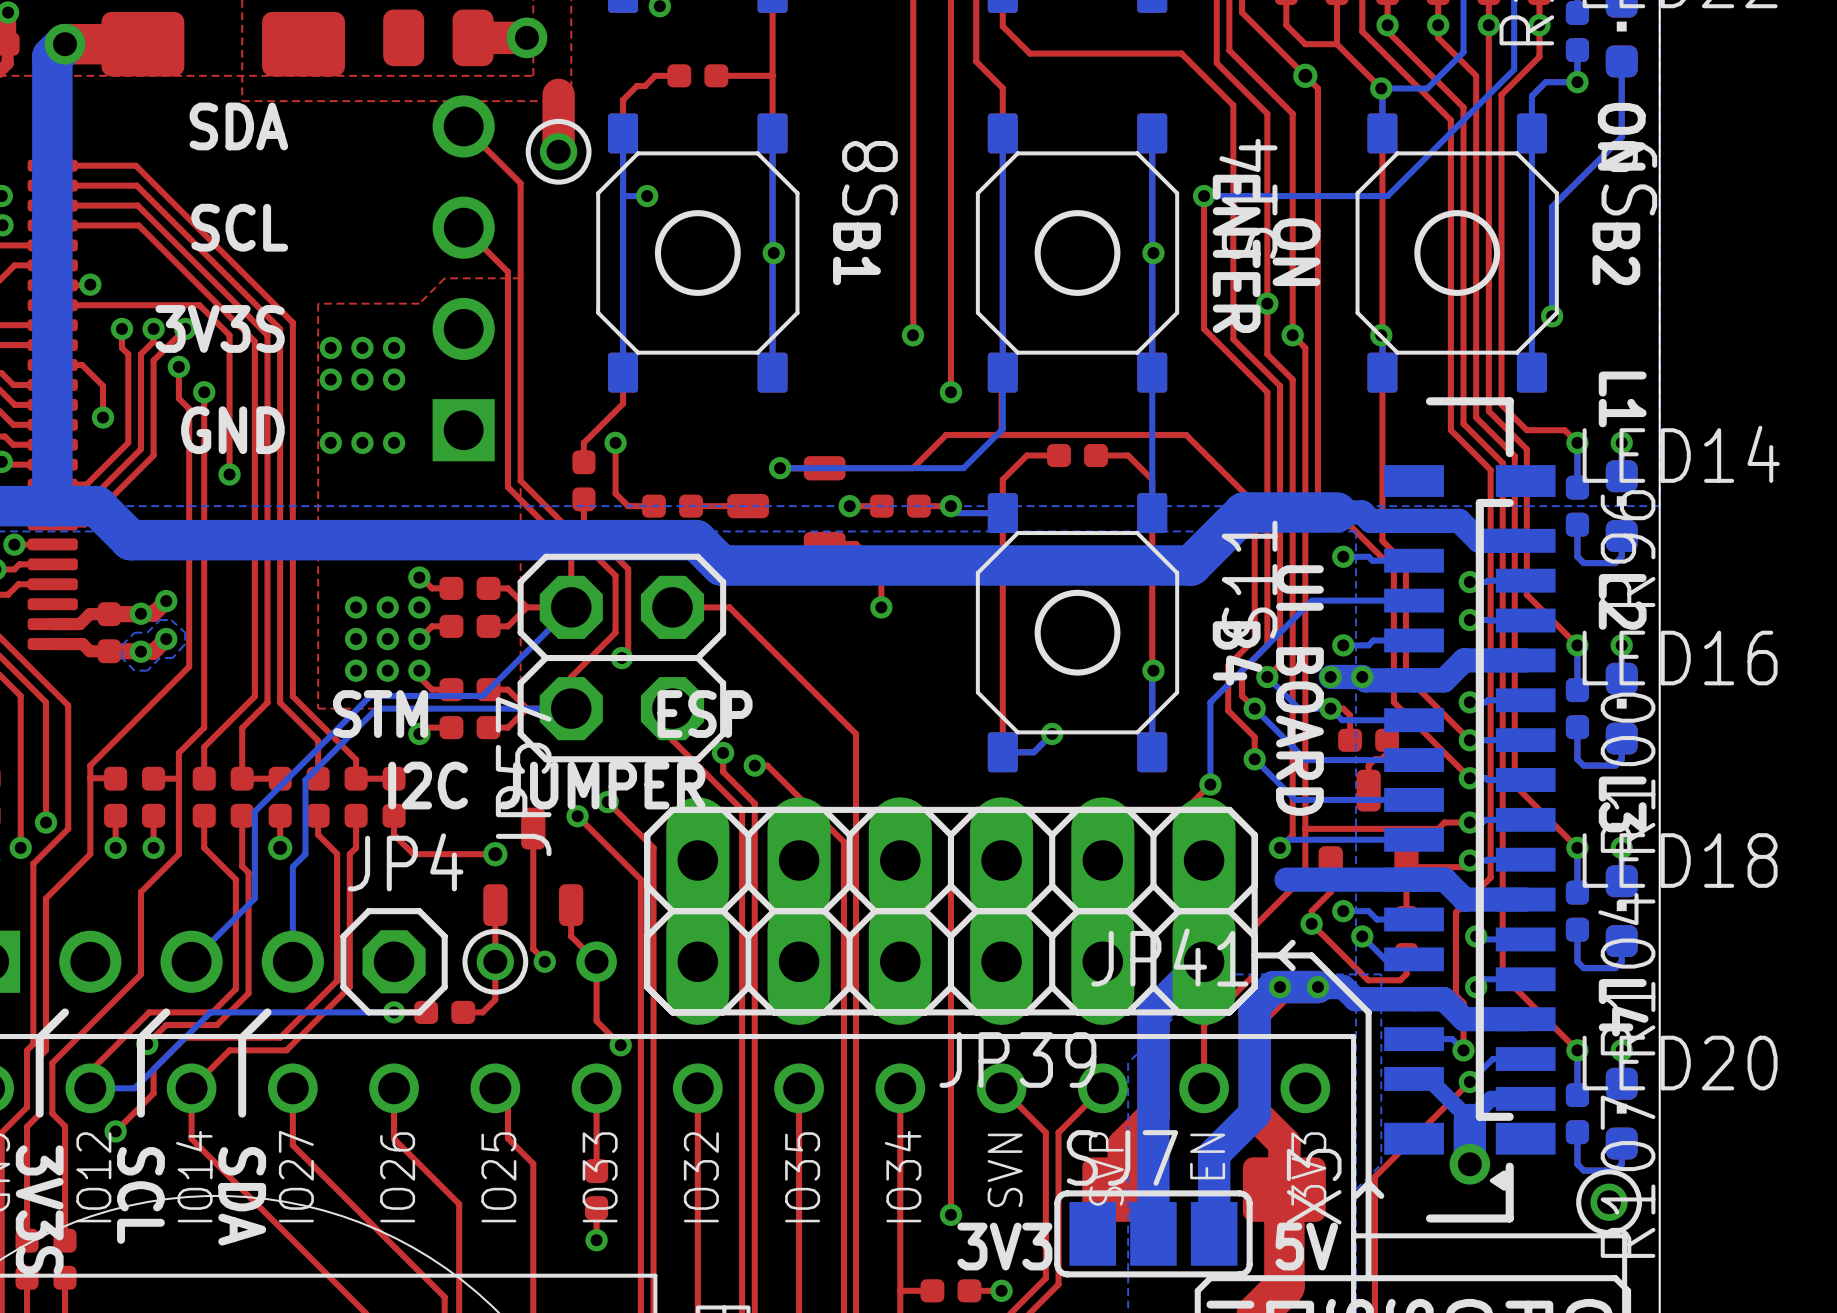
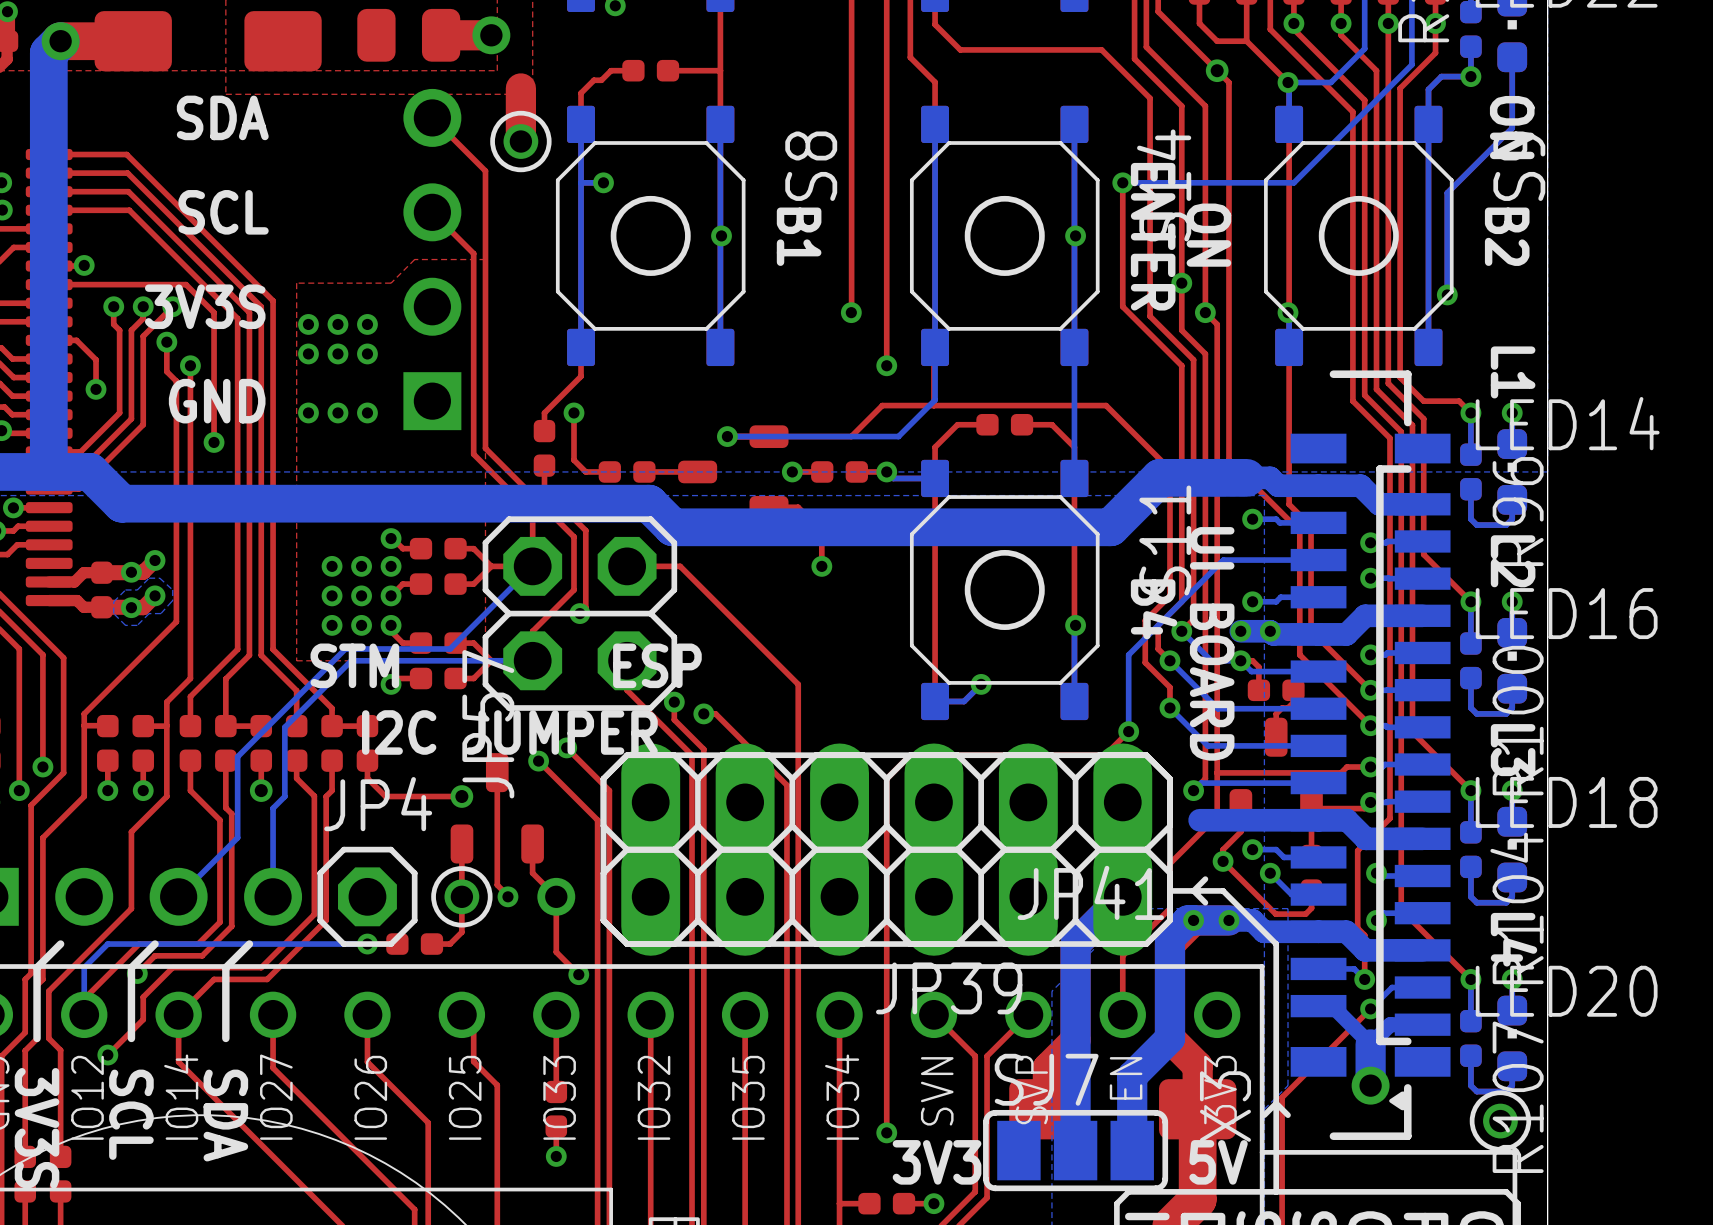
bottom track: (210, 1012) (134, 1088) (90, 1088) -> (196, 944) (107, 944) (84, 967) (84, 1014)

